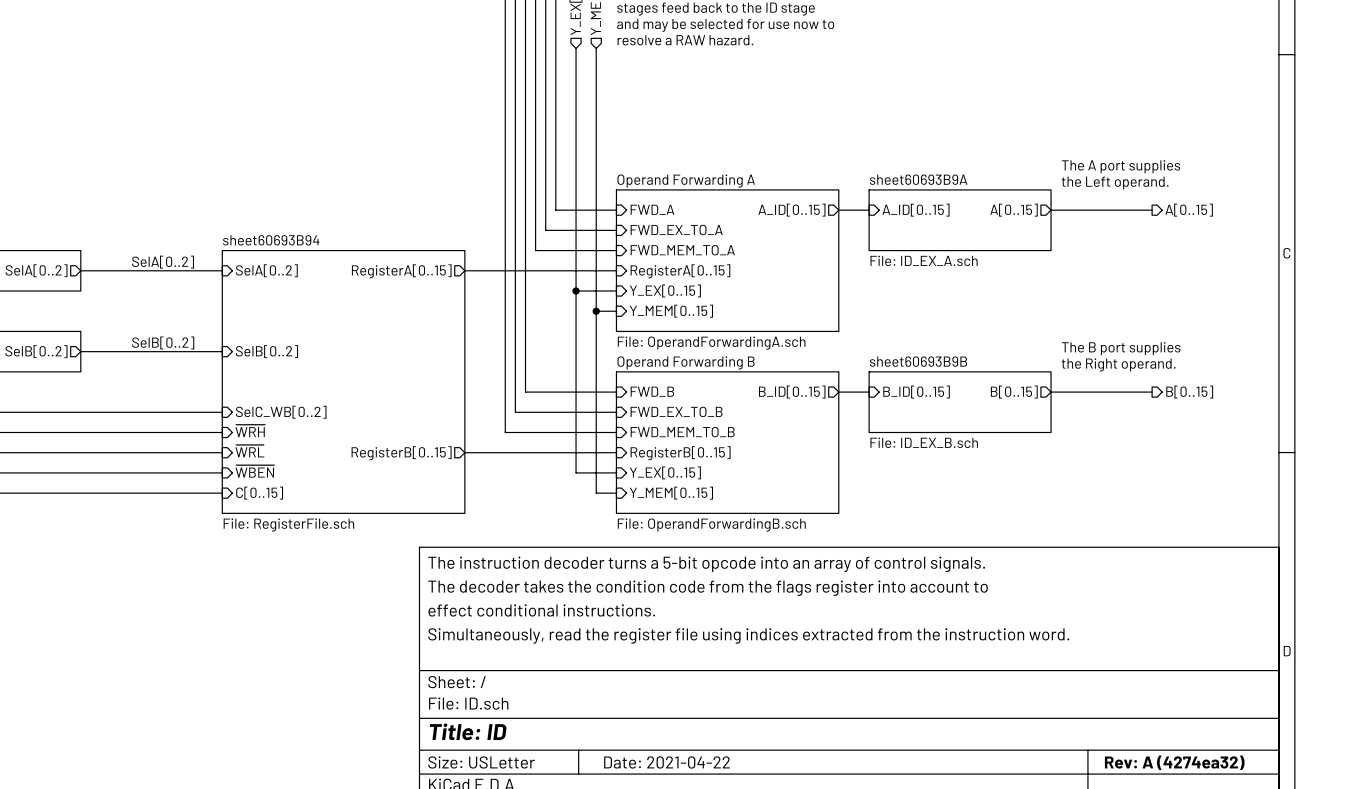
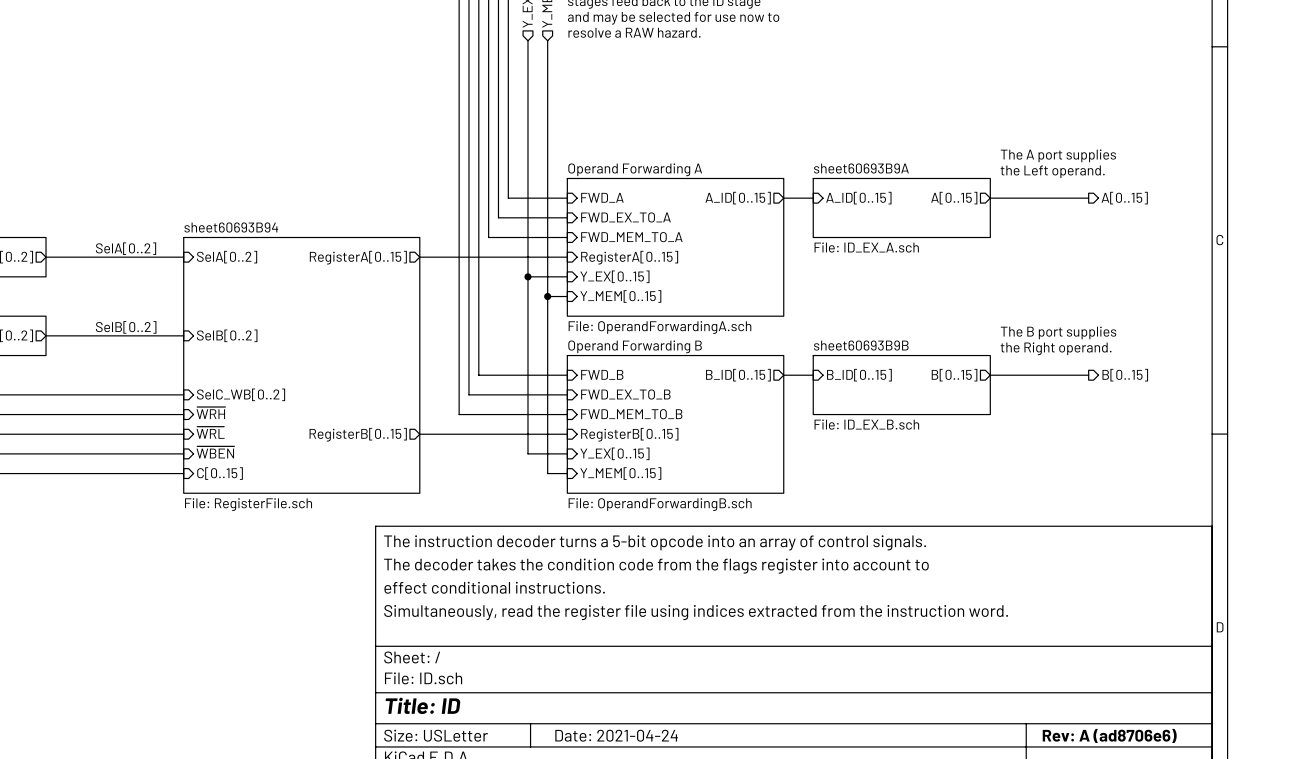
title block: Date: 2021-04-22 (667, 762) -> Date: 2021-04-24 (616, 735)
title block: Rev: A (4274ea32) (1174, 762) -> Rev: A (ad8706e6) (1109, 735)

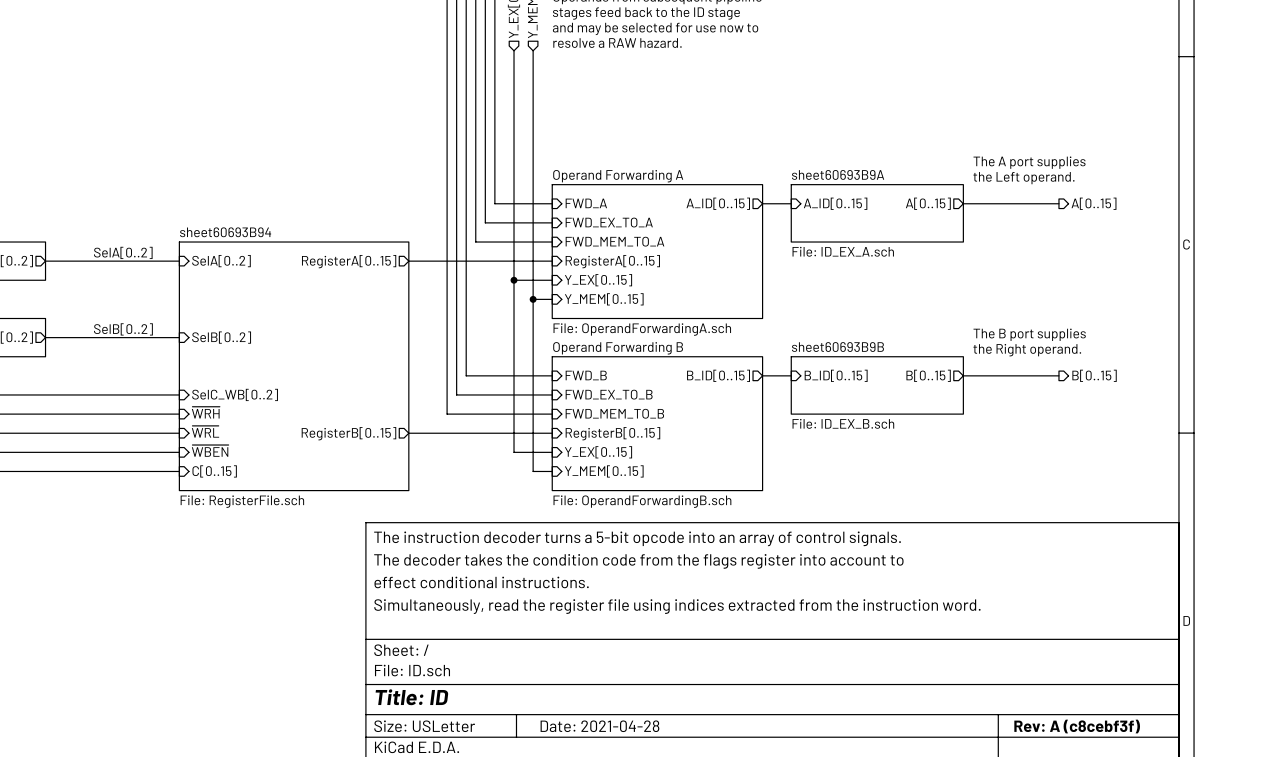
title block: Date: 2021-04-24 (616, 735) -> Date: 2021-04-28 (599, 726)
title block: Rev: A (ad8706e6) (1109, 735) -> Rev: A (c8cebf3f) (1077, 726)

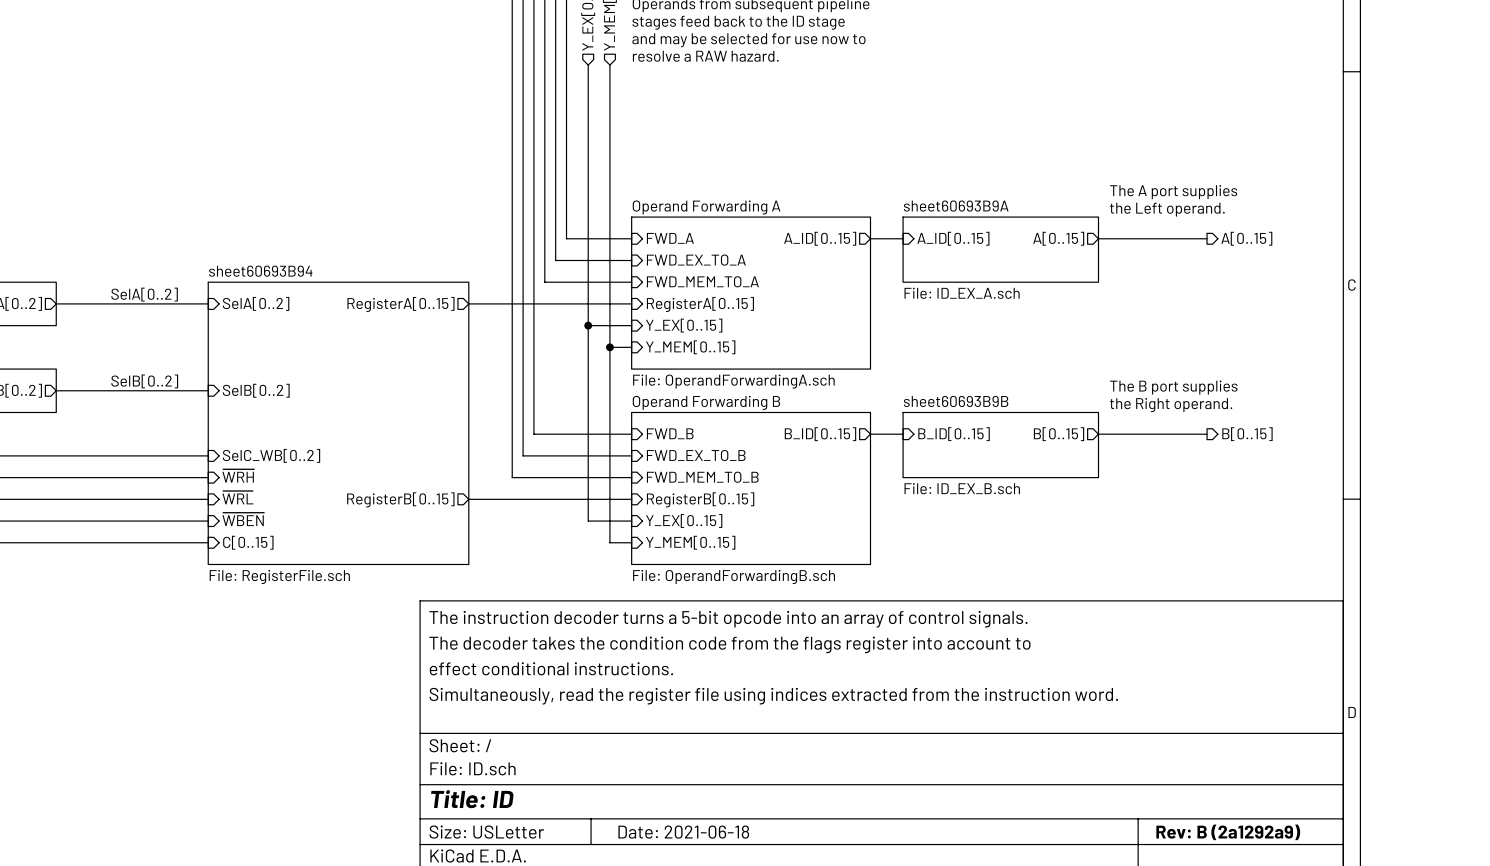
title block: Date: 2021-04-28 (599, 726) -> Date: 2021-06-18 (683, 832)
title block: Rev: A (c8cebf3f) (1077, 726) -> Rev: B (2a1292a9) (1228, 832)

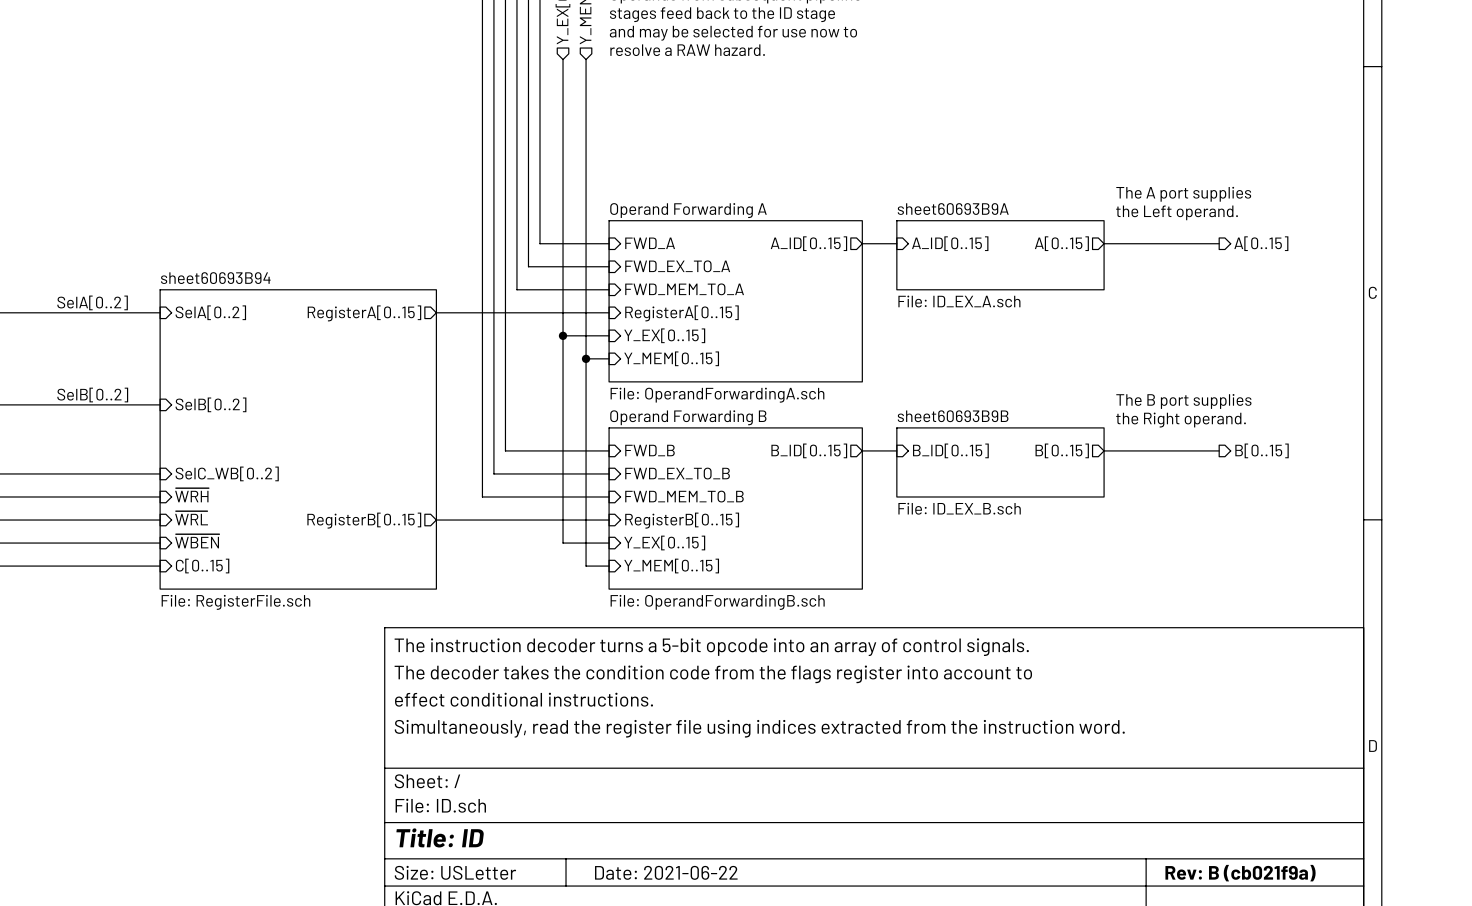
title block: Date: 2021-06-18 (683, 832) -> Date: 2021-06-22 (666, 872)
title block: Rev: B (2a1292a9) (1228, 832) -> Rev: B (cb021f9a) (1240, 873)

